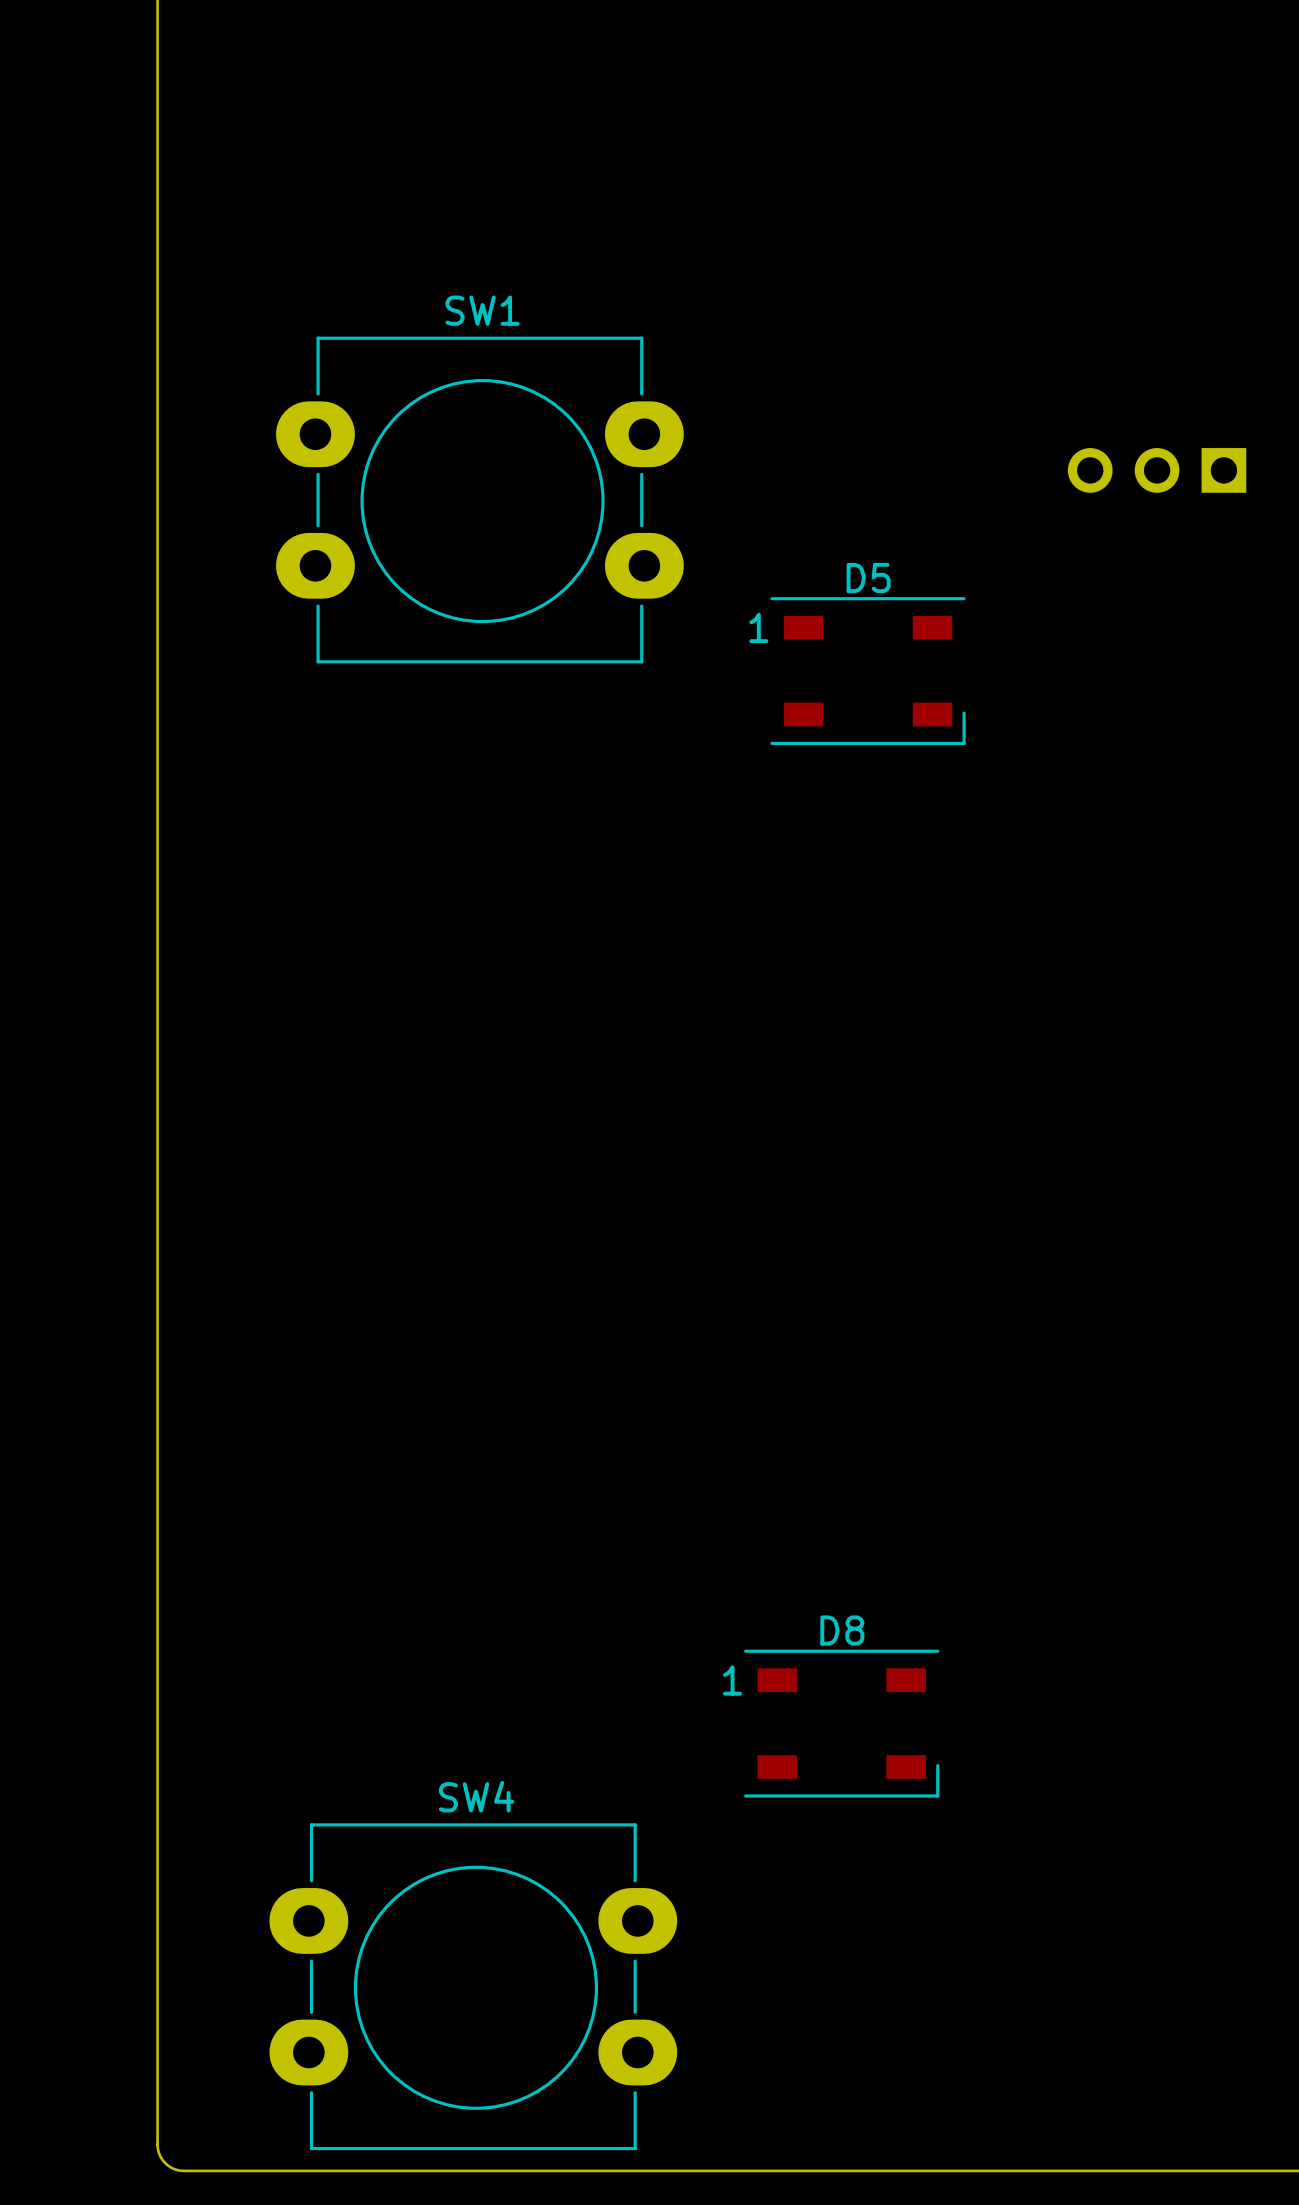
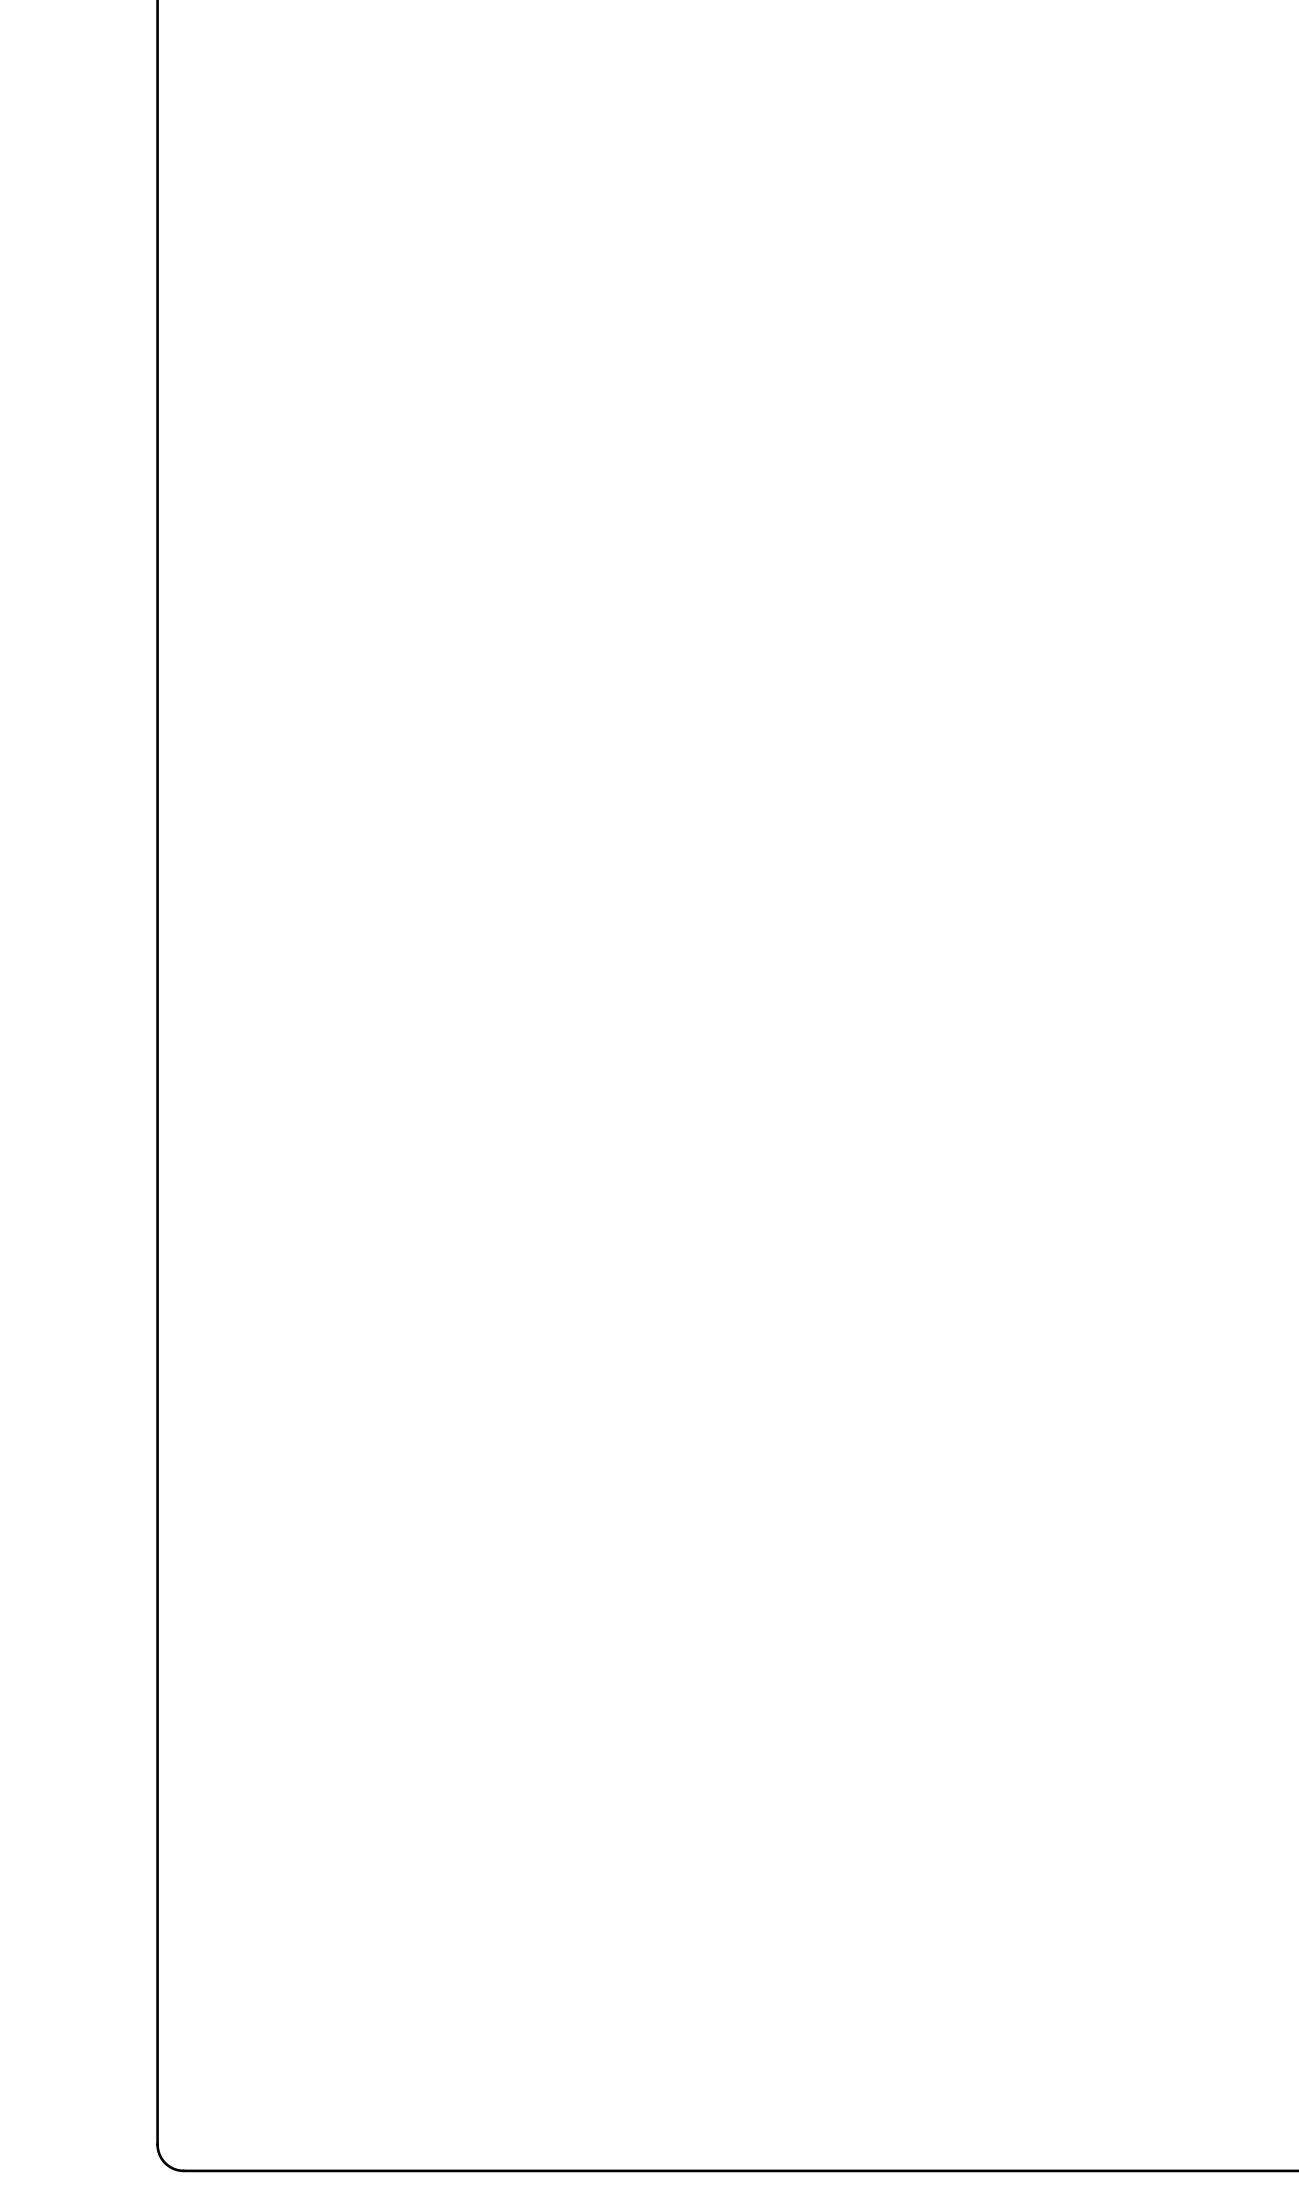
part: (1157, 470) -> none
SW1: (479, 500) -> none
D5: (868, 671) -> none
D8: (841, 1723) -> none
SW4: (473, 1986) -> none

